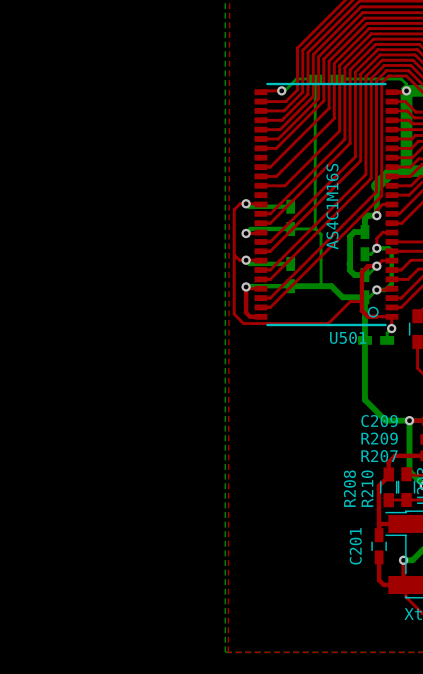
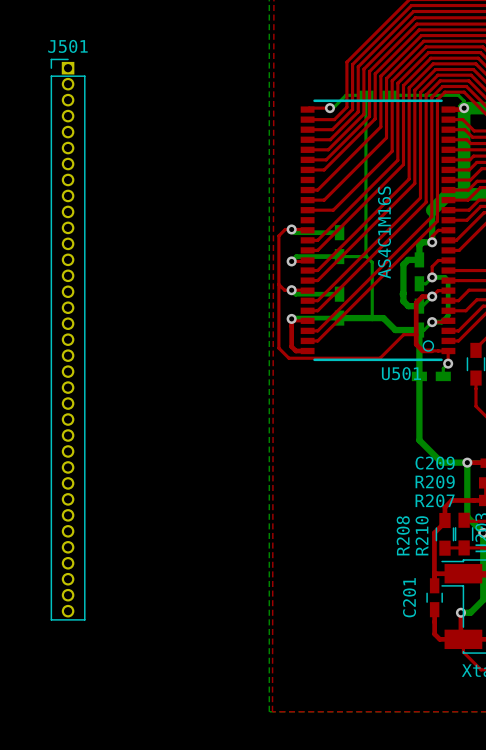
J501: none -> (68, 339)

